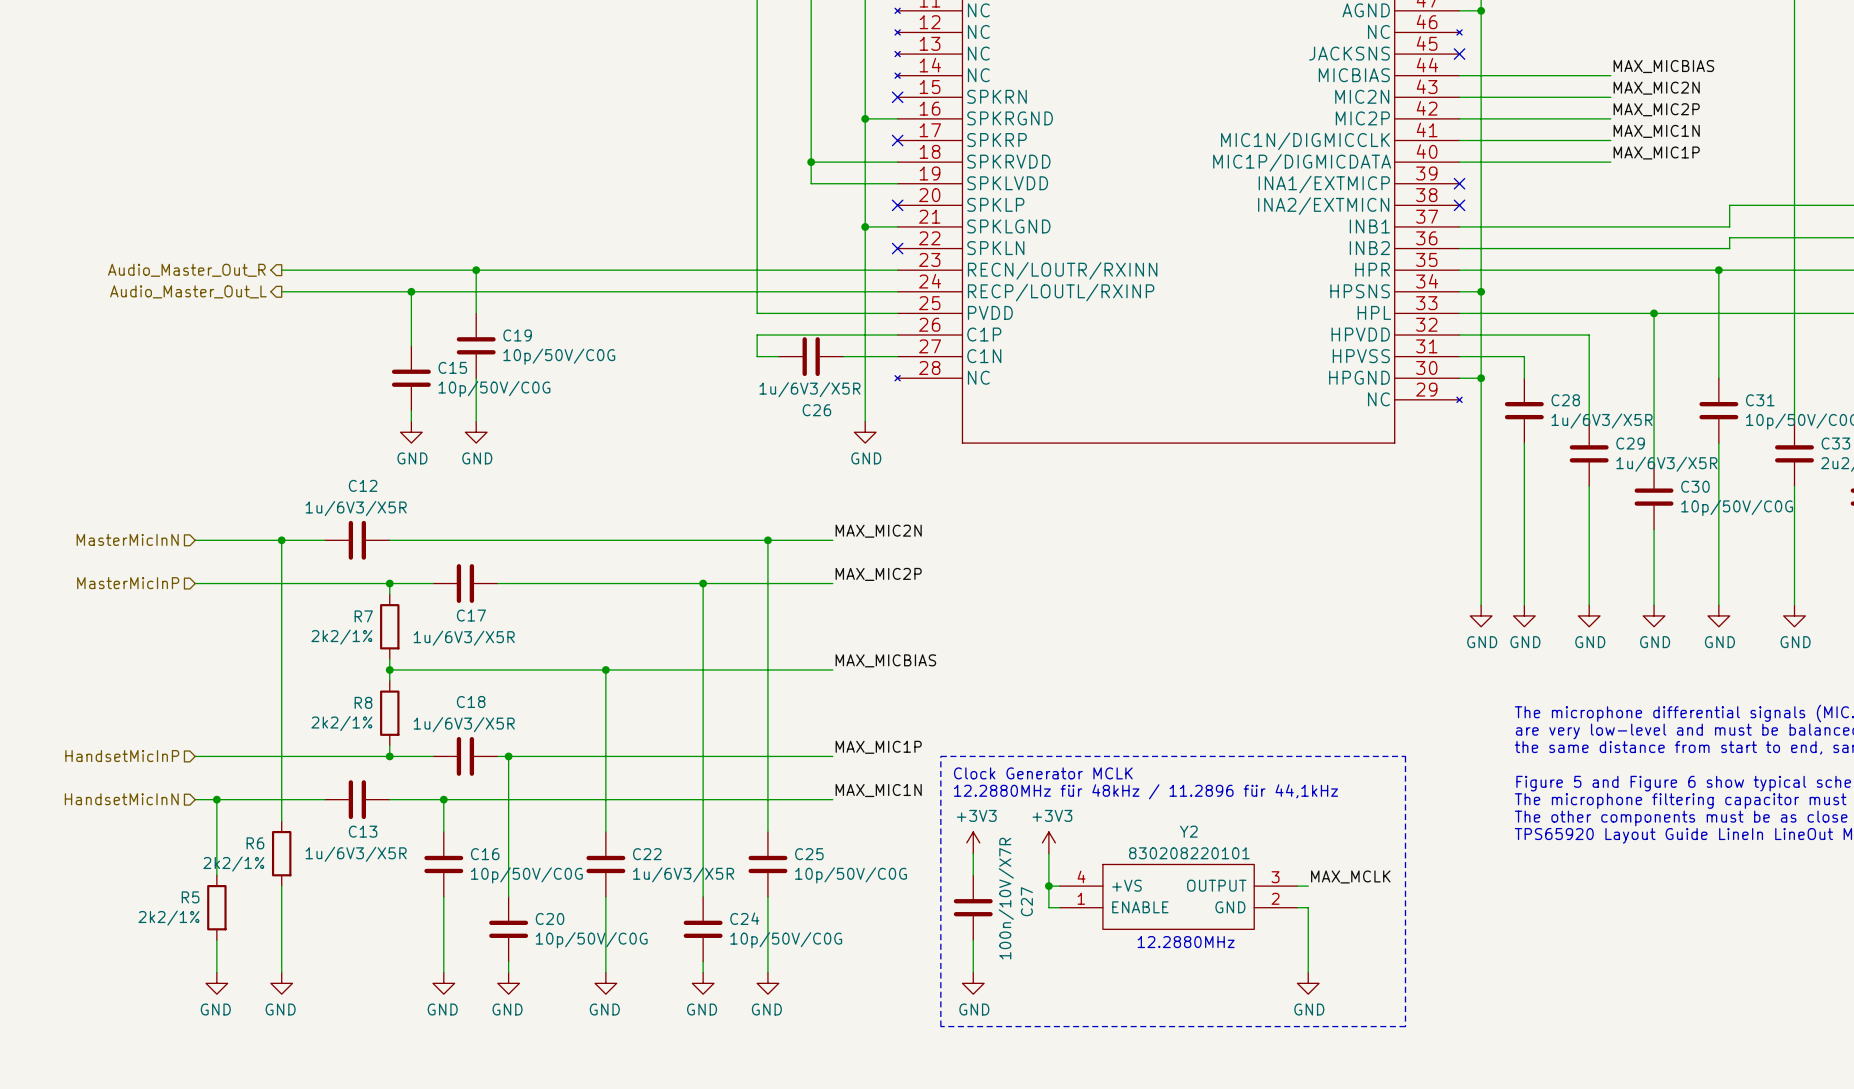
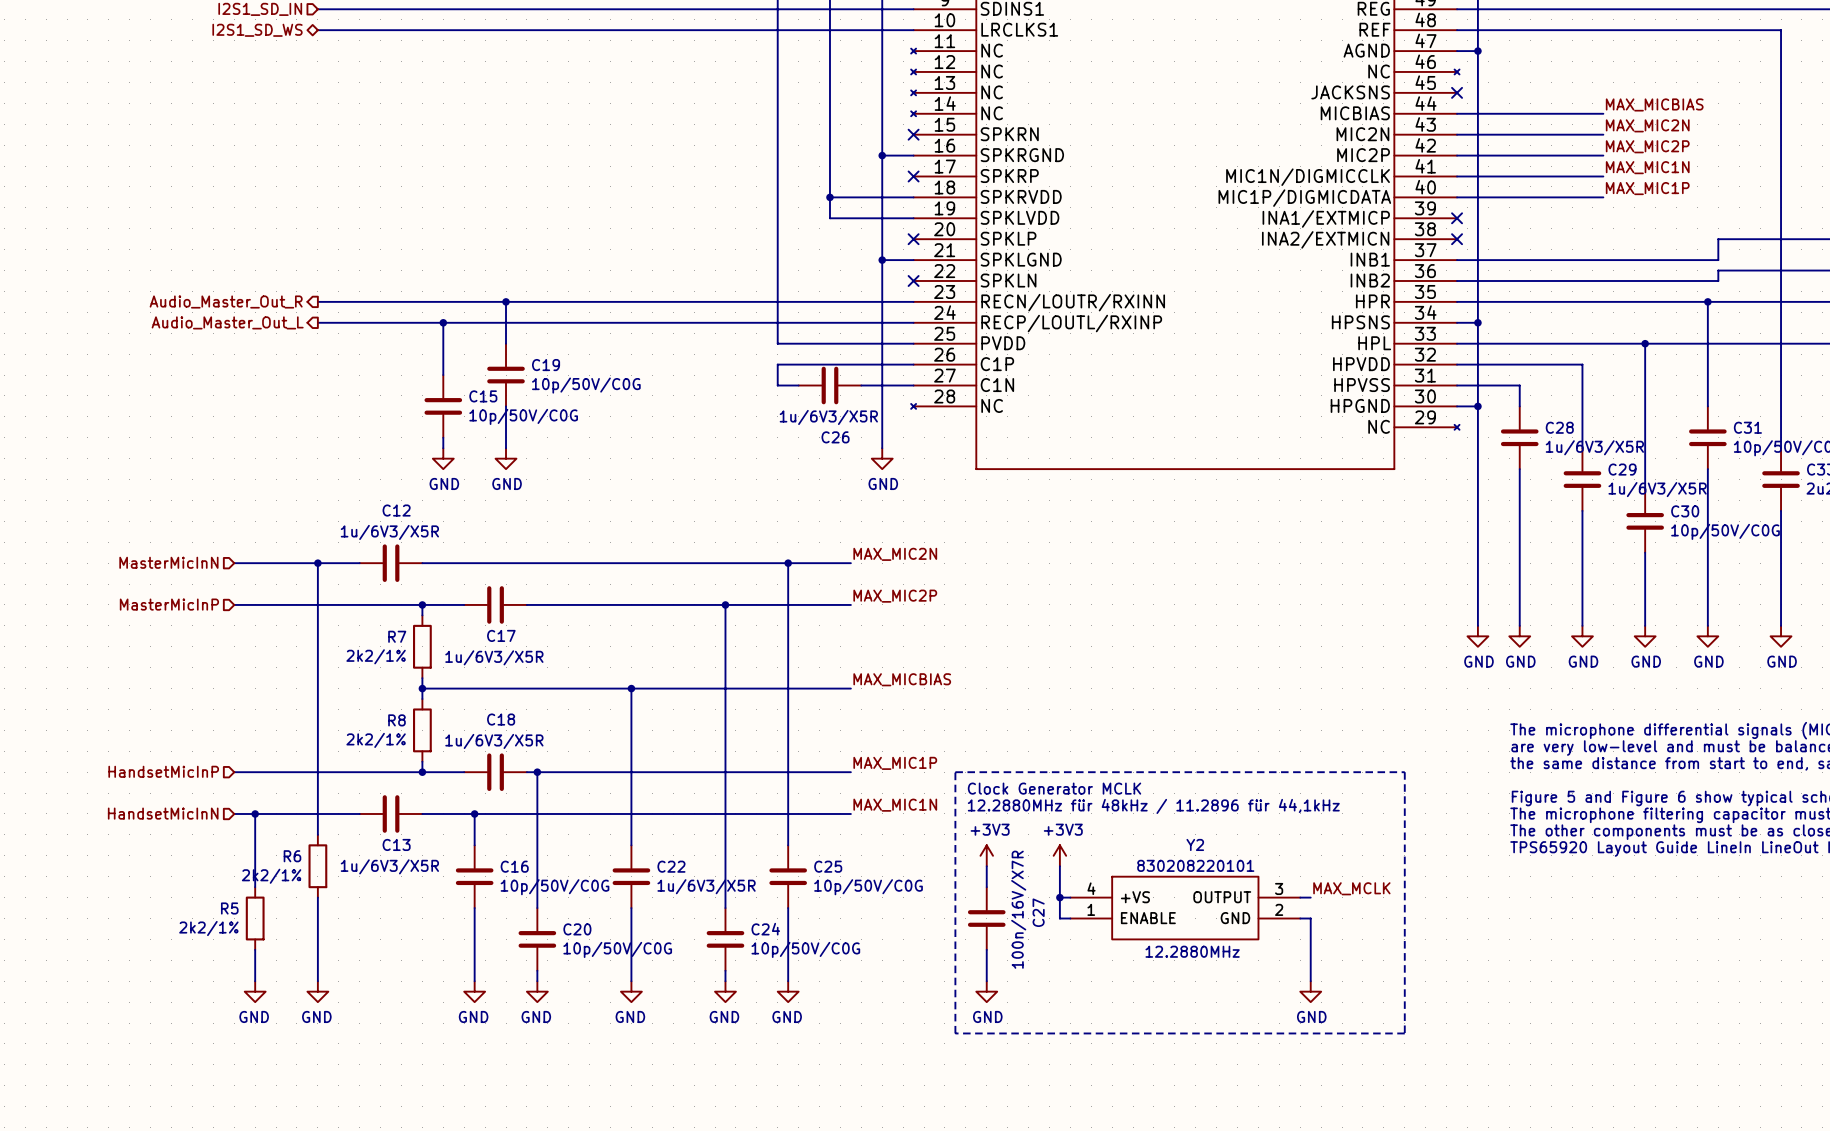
C27 value: 100n/10V/X7R (1006, 898) -> 100n/16V/X7R (1018, 909)

